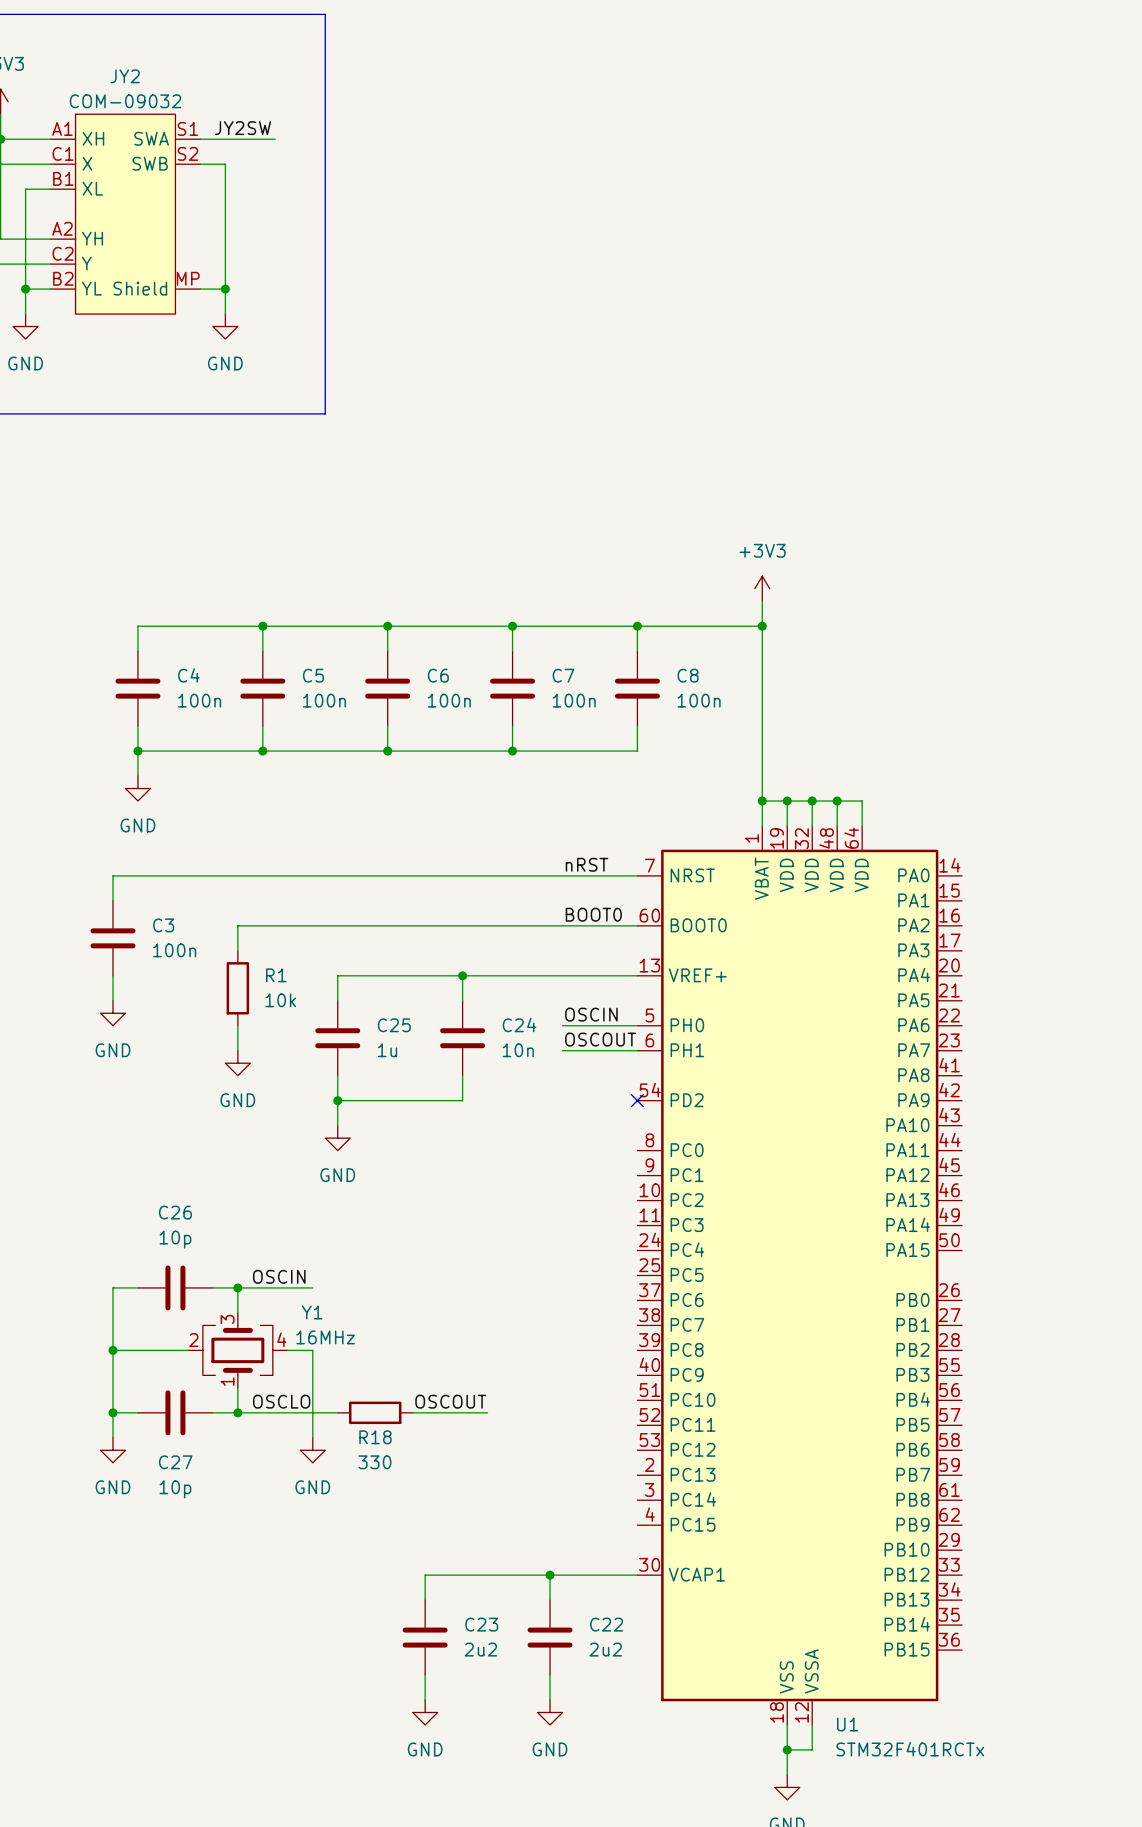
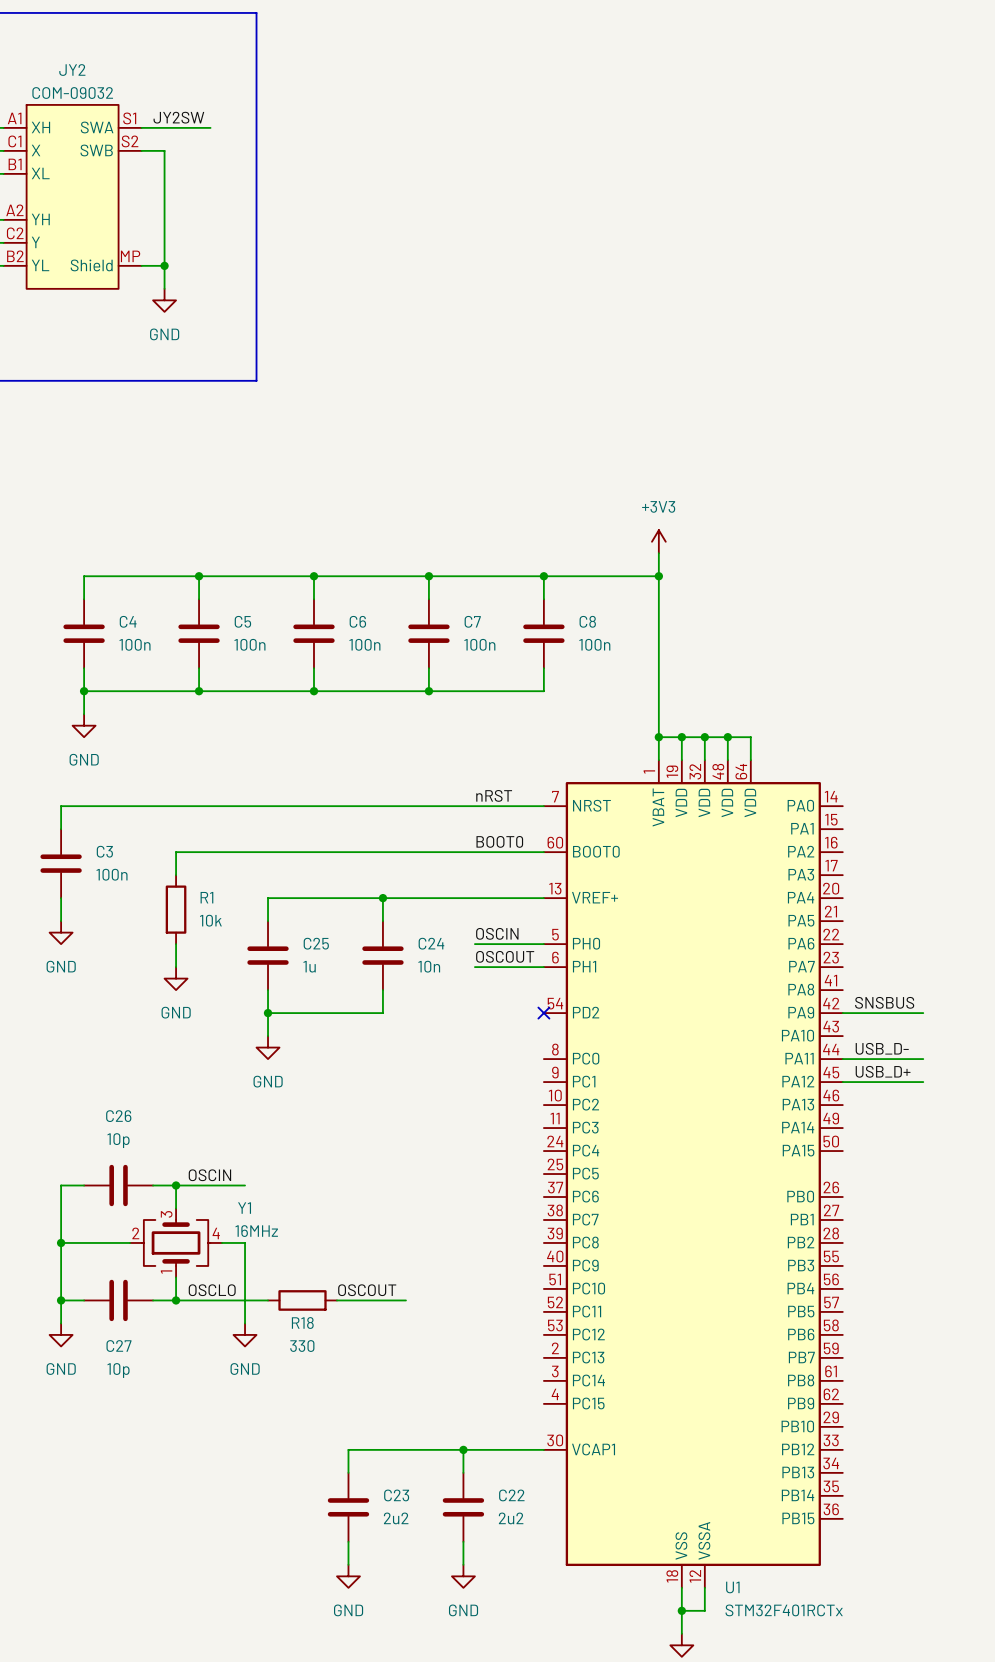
label: none -> SNSBUS (884, 1002)
wire: none -> (842, 1013) (923, 1013)
label: none -> USB_D- (882, 1048)
wire: none -> (842, 1059) (923, 1059)
label: none -> USB_D+ (883, 1071)
wire: none -> (842, 1082) (923, 1082)

